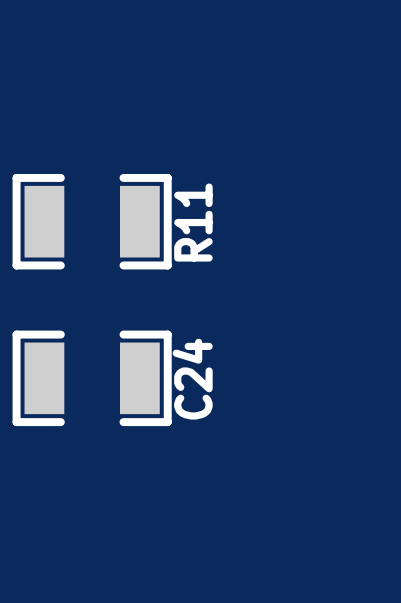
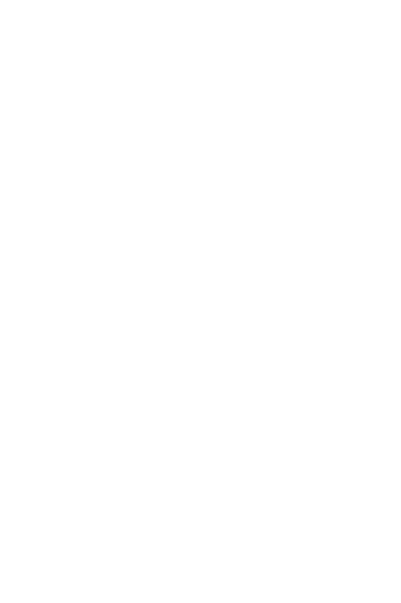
R11: (92, 221) -> none
C24: (92, 378) -> none

